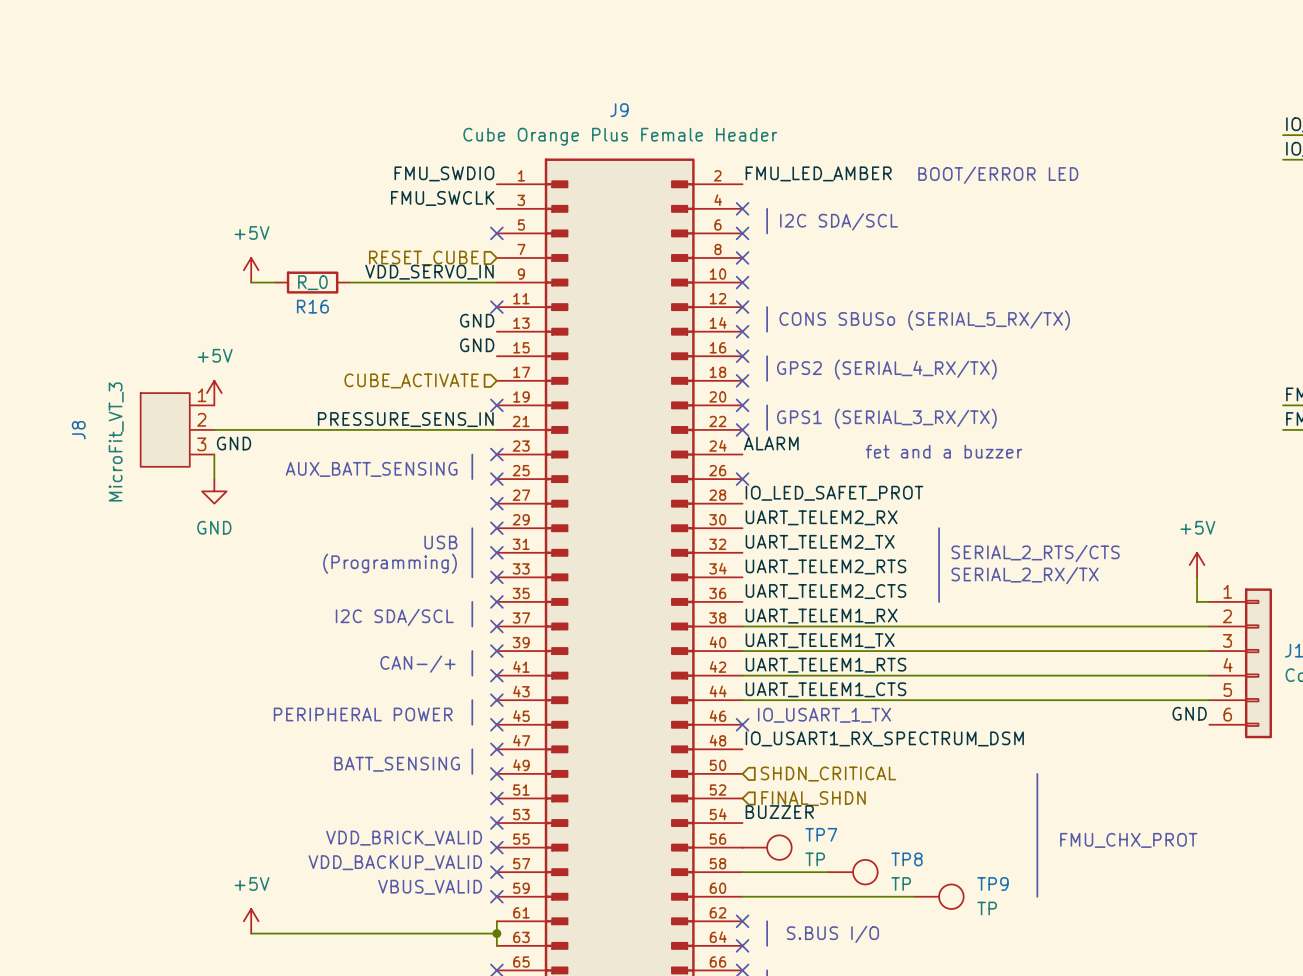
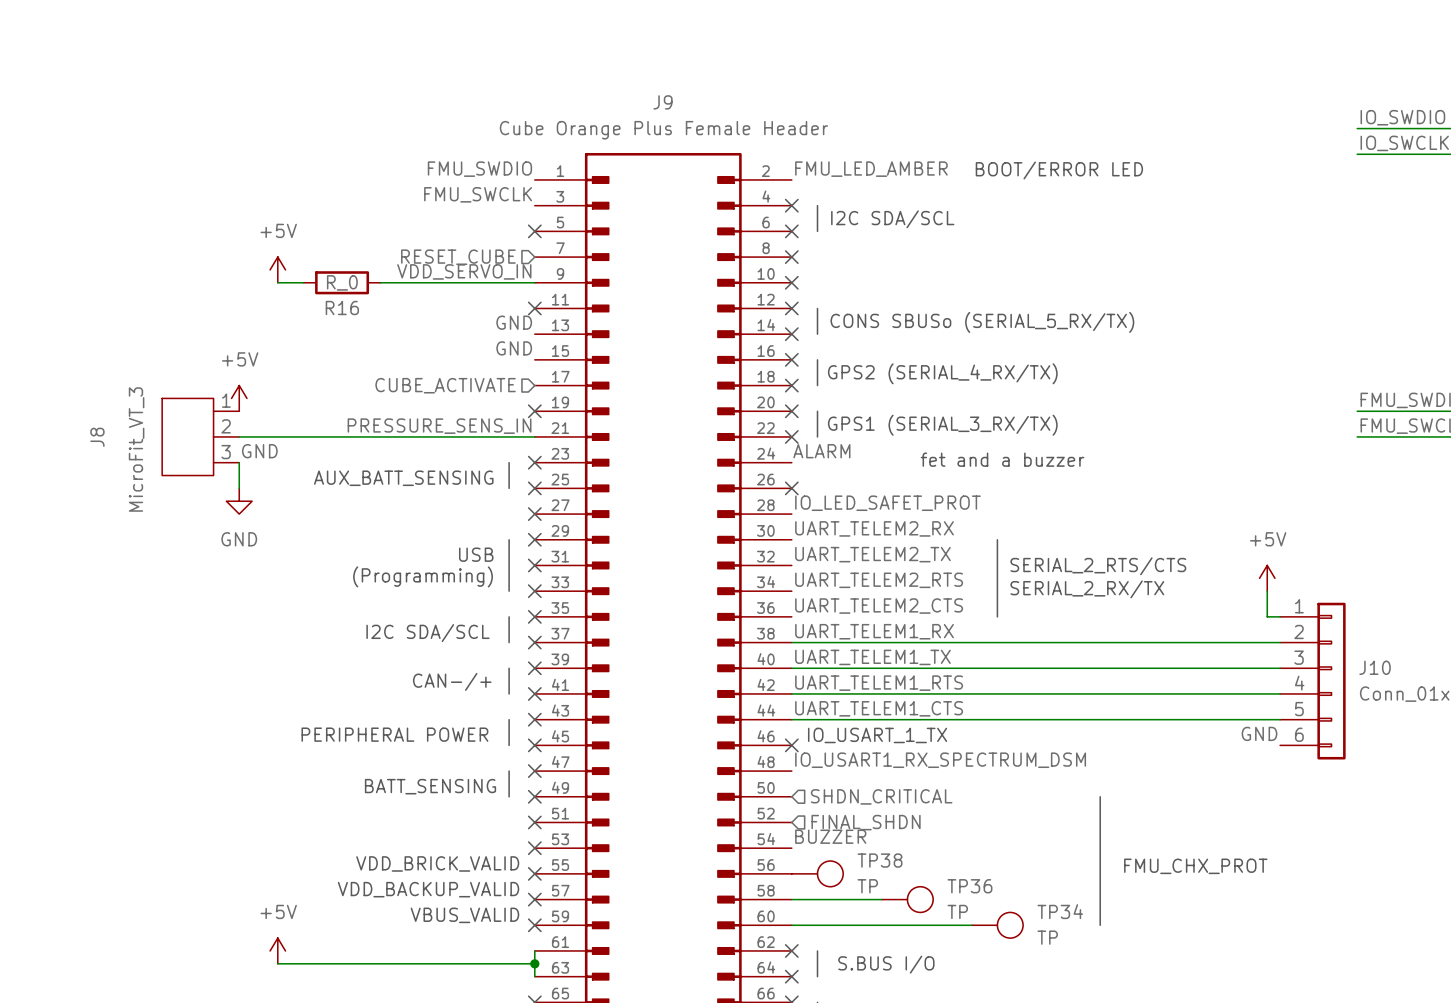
TP7 name: TP7 (821, 834) -> TP38 (880, 860)
TP8 name: TP8 (907, 859) -> TP36 (969, 886)
TP9 name: TP9 (992, 883) -> TP34 (1060, 911)

